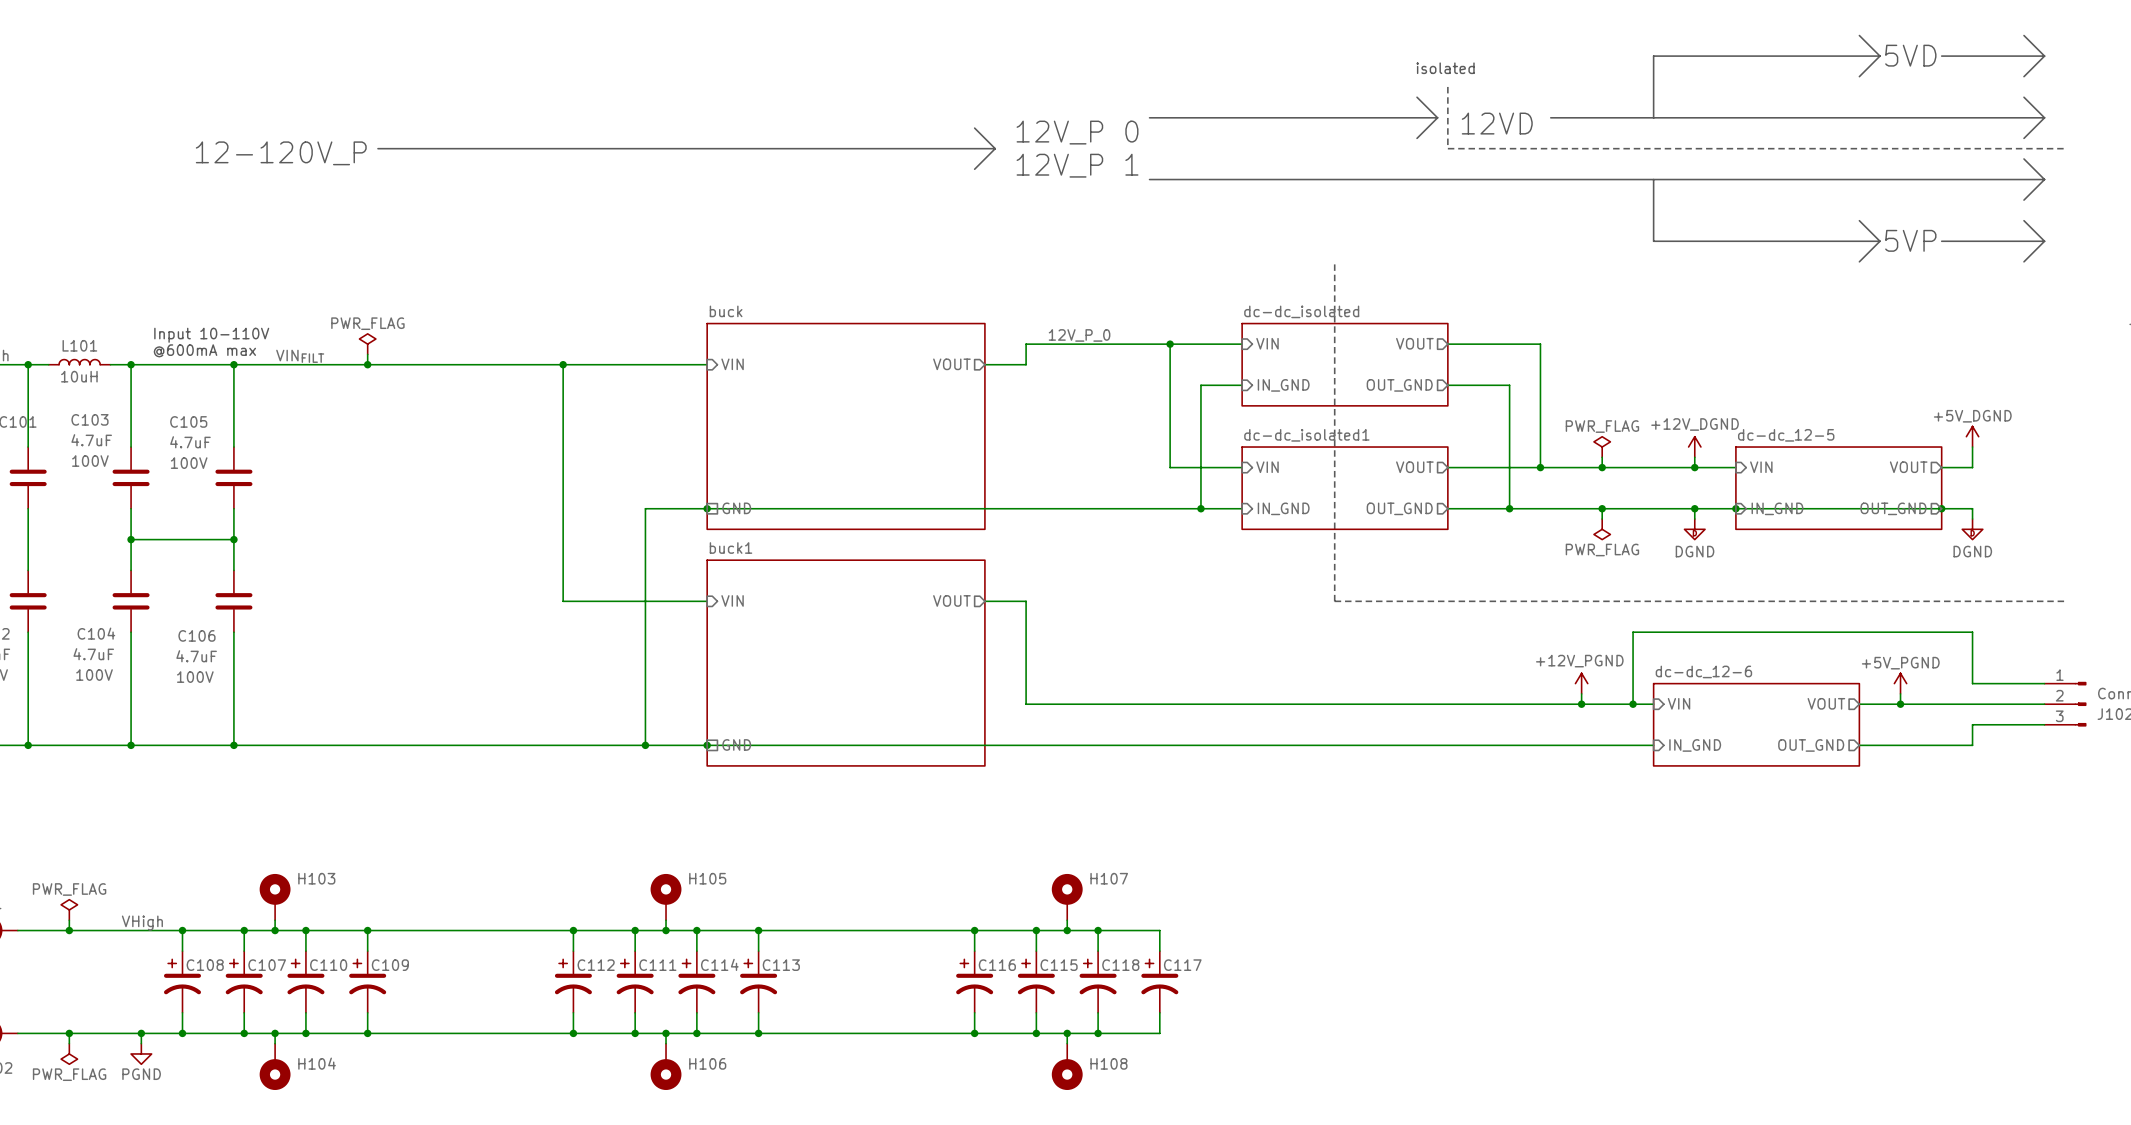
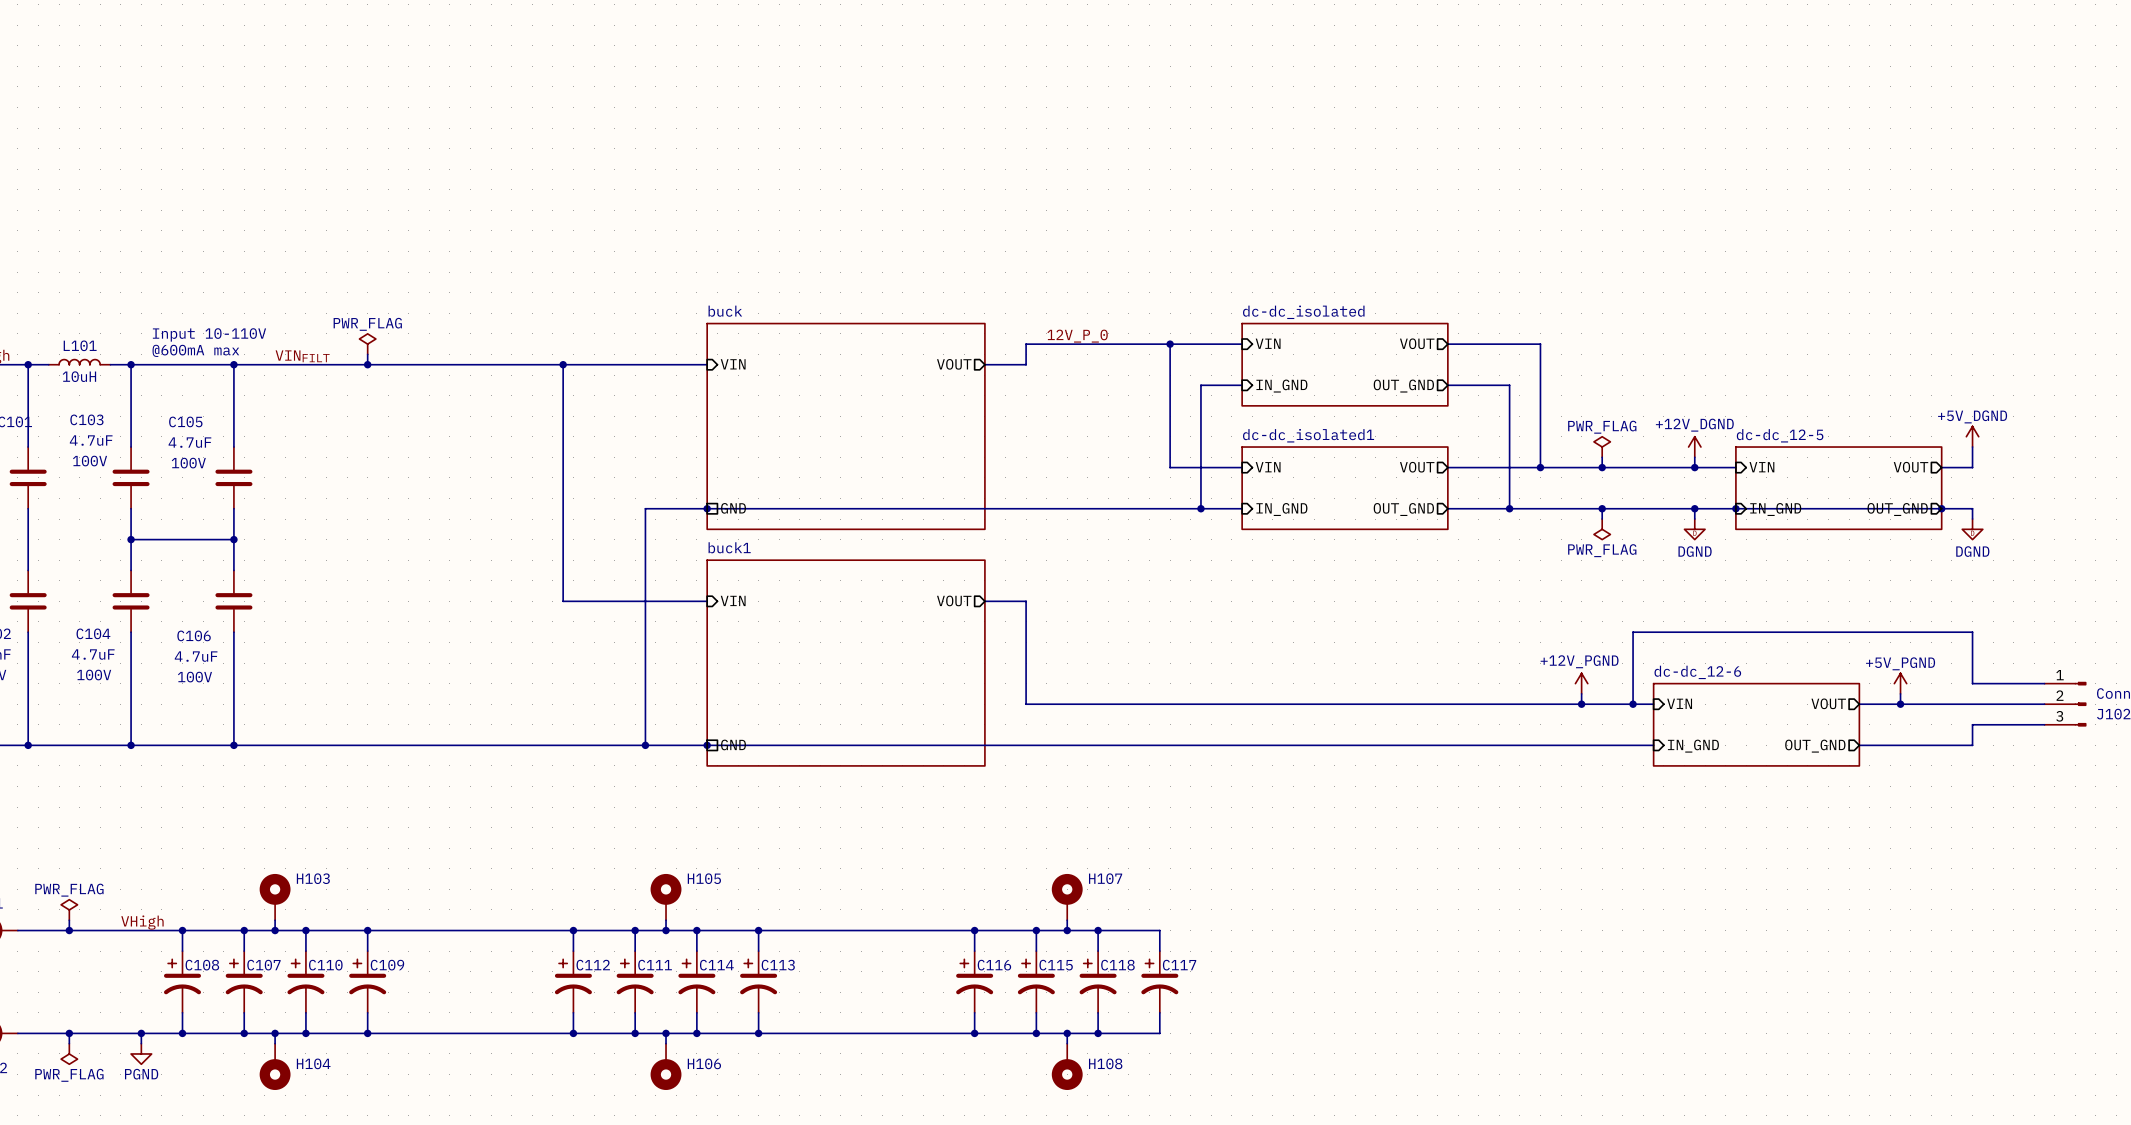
line: (1859, 35) (1879, 56) -> none
line: (2023, 35) (2044, 56) -> none
text: 5VD (1910, 55) -> none
line: (1879, 56) (1653, 56) (1653, 117) -> none
line: (1879, 56) (1859, 76) -> none
line: (1941, 56) (2044, 56) -> none
line: (2044, 56) (2023, 76) -> none
text: isolated (1445, 68) -> none
line: (1447, 86) (1447, 148) (2065, 148) -> none
line: (1417, 97) (1437, 117) -> none
line: (2023, 97) (2044, 117) -> none
line: (1149, 117) (1437, 117) -> none
line: (1437, 117) (1417, 138) -> none
line: (1550, 117) (2044, 117) -> none
line: (2044, 117) (2023, 138) -> none
text: 12VD (1497, 123) -> none
line: (974, 128) (995, 148) -> none
text: 12V_P 0 (1077, 132) -> none
line: (377, 148) (995, 148) -> none
line: (995, 148) (974, 169) -> none
text: 12-120V_P (281, 153) -> none
line: (2023, 158) (2044, 179) -> none
text: 12V_P 1 (1077, 165) -> none
line: (1149, 179) (2044, 179) -> none
line: (1653, 179) (1653, 241) (1879, 241) -> none
line: (2044, 179) (2023, 200) -> none
line: (1859, 220) (1879, 241) -> none
line: (2023, 220) (2044, 241) -> none
text: 5VP (1910, 240) -> none
line: (1879, 241) (1859, 261) -> none
line: (1941, 241) (2044, 241) -> none
line: (2044, 241) (2023, 261) -> none
line: (1334, 261) (1334, 601) (2065, 601) -> none

